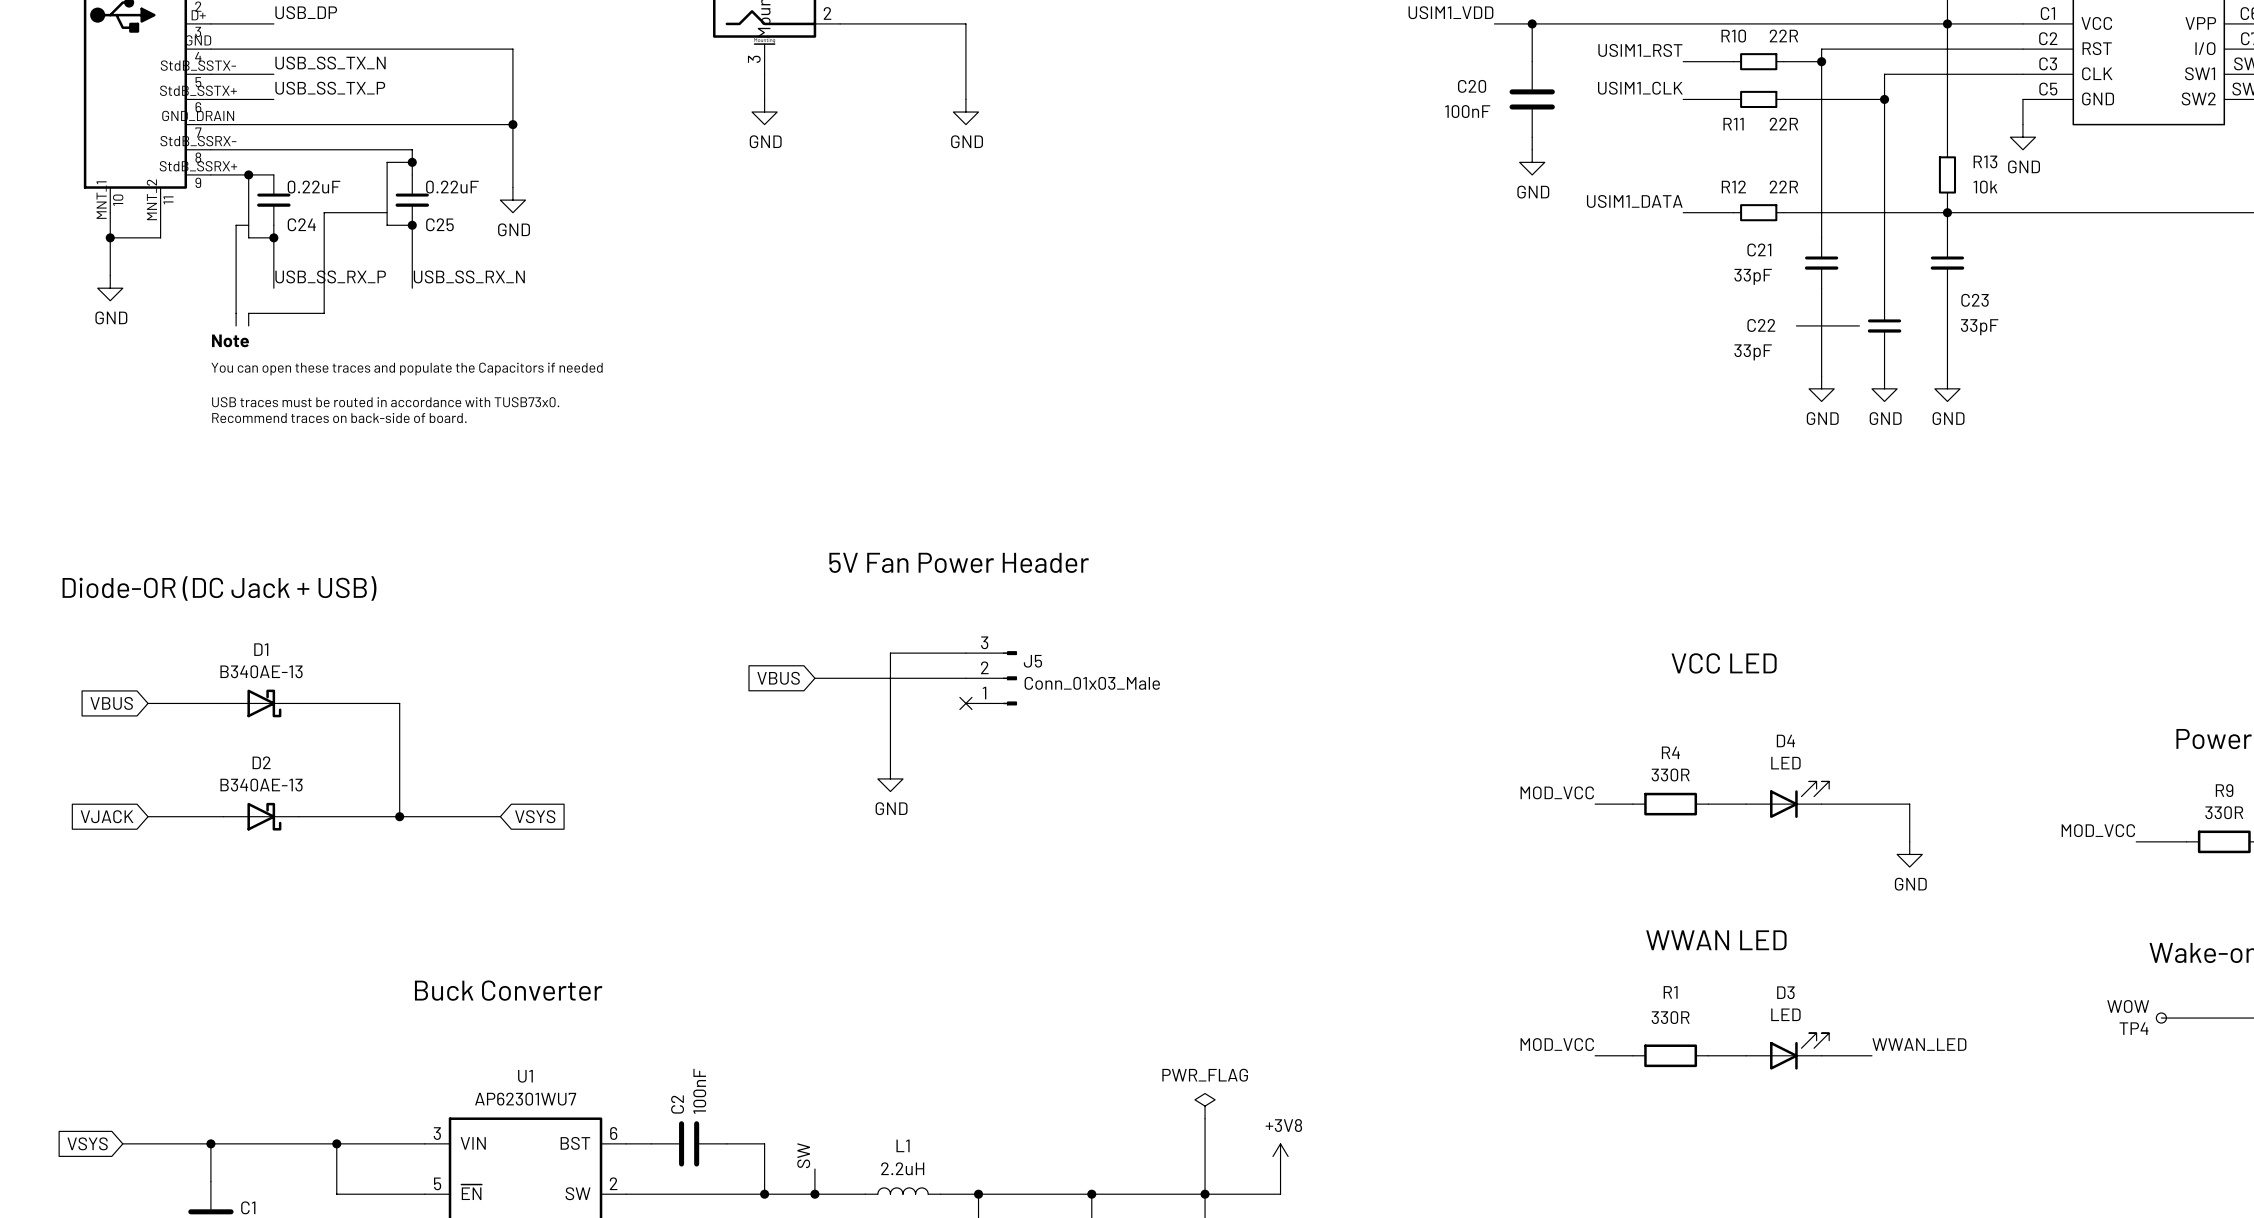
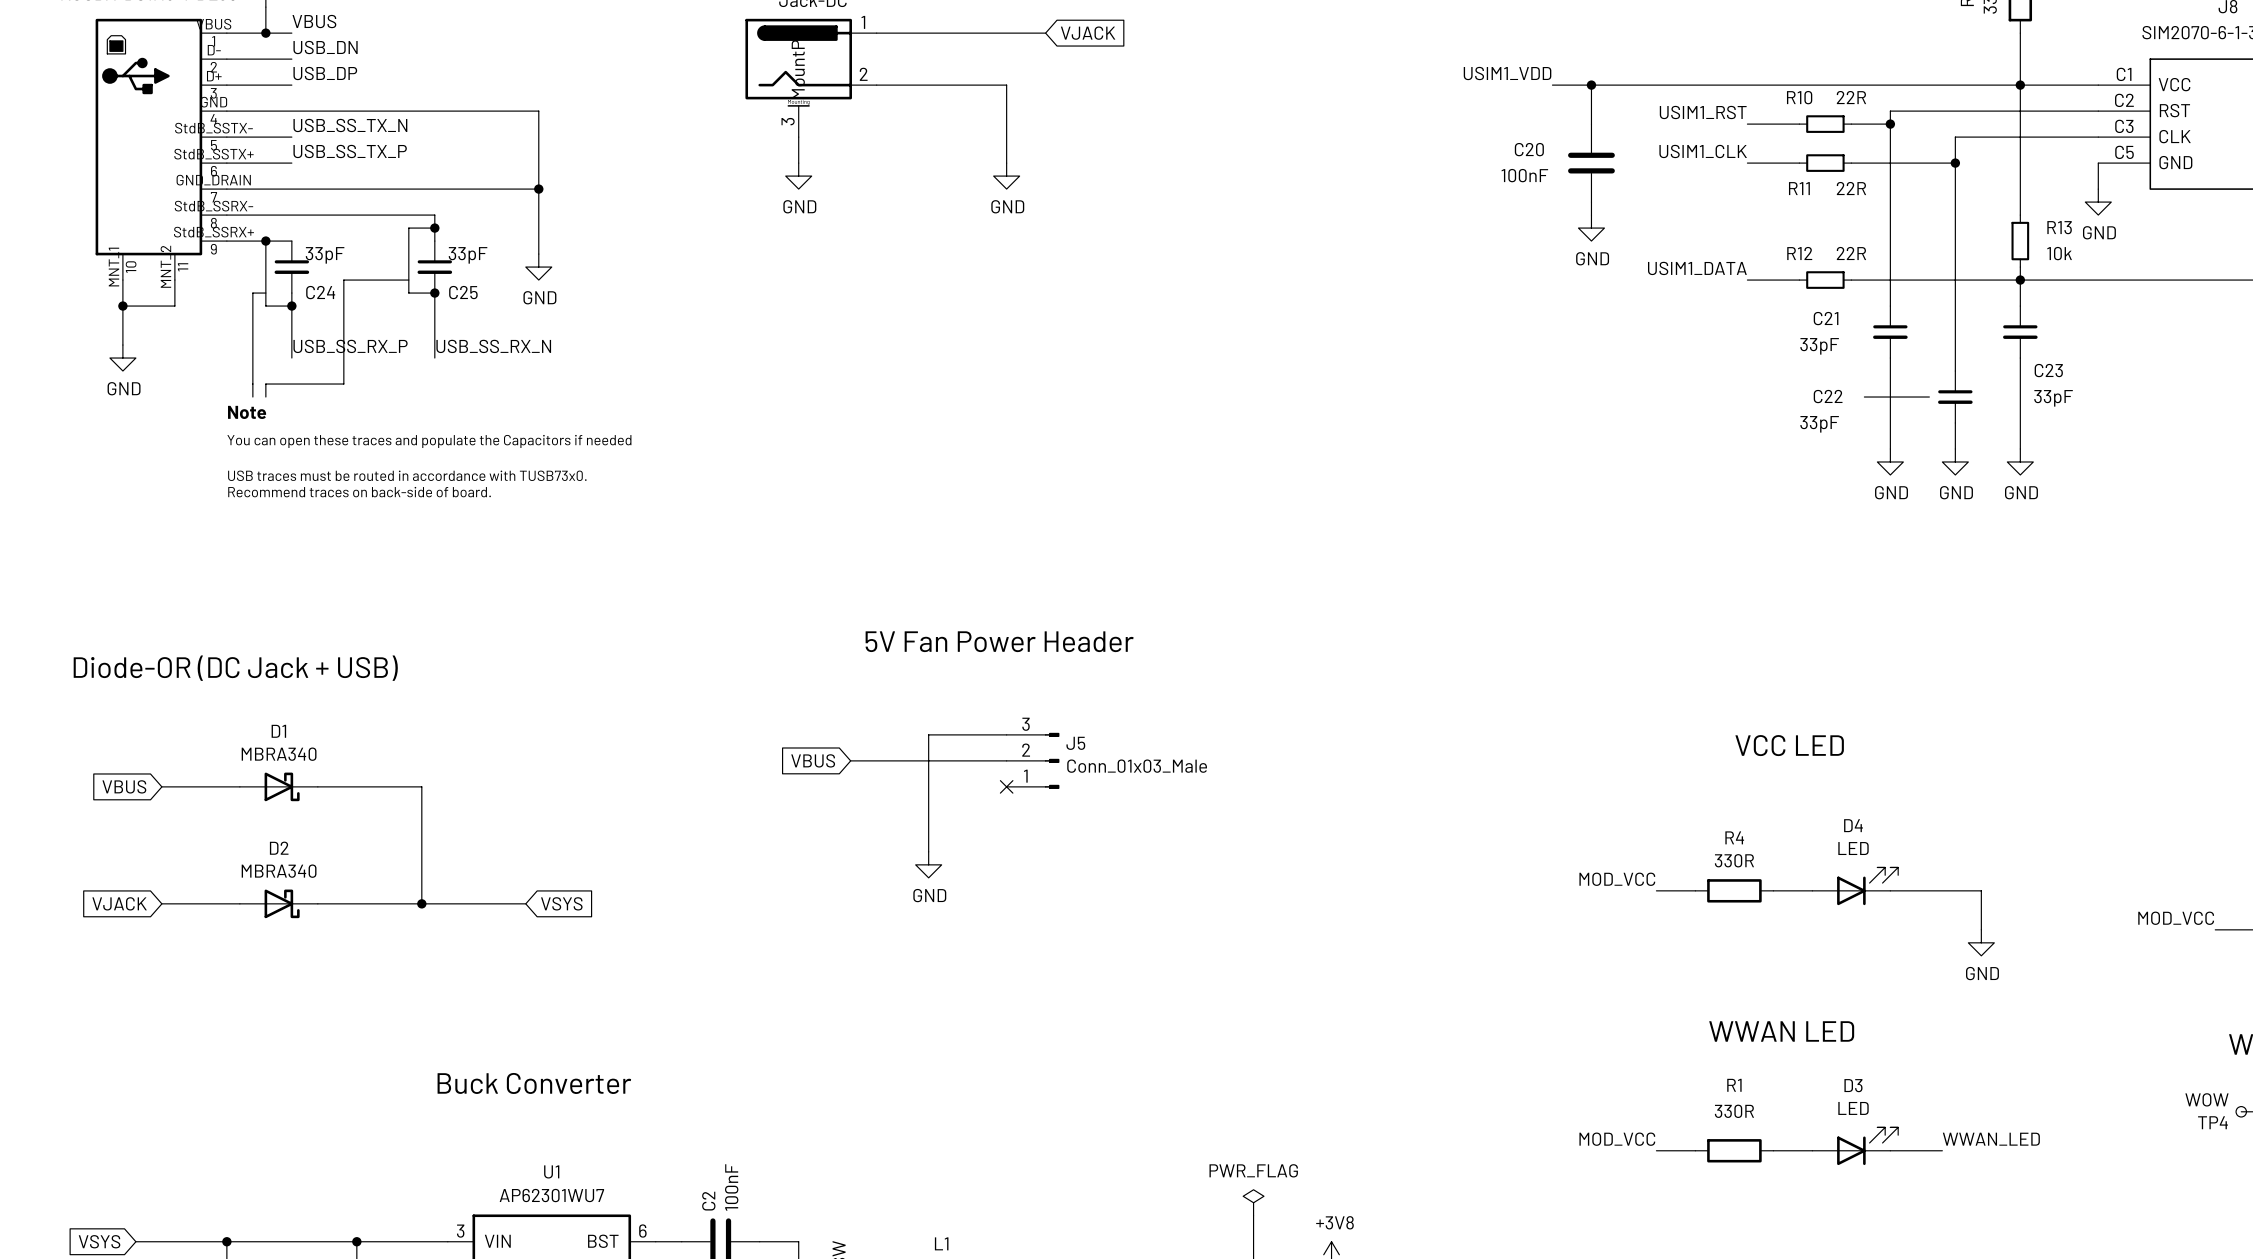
C24 value: 0.22uF (314, 187) -> 33pF (325, 255)
C25 value: 0.22uF (452, 187) -> 33pF (468, 255)
D1 value: B340AE-13 (261, 671) -> MBRA340 (279, 754)
D2 value: B340AE-13 (261, 785) -> MBRA340 (279, 871)

